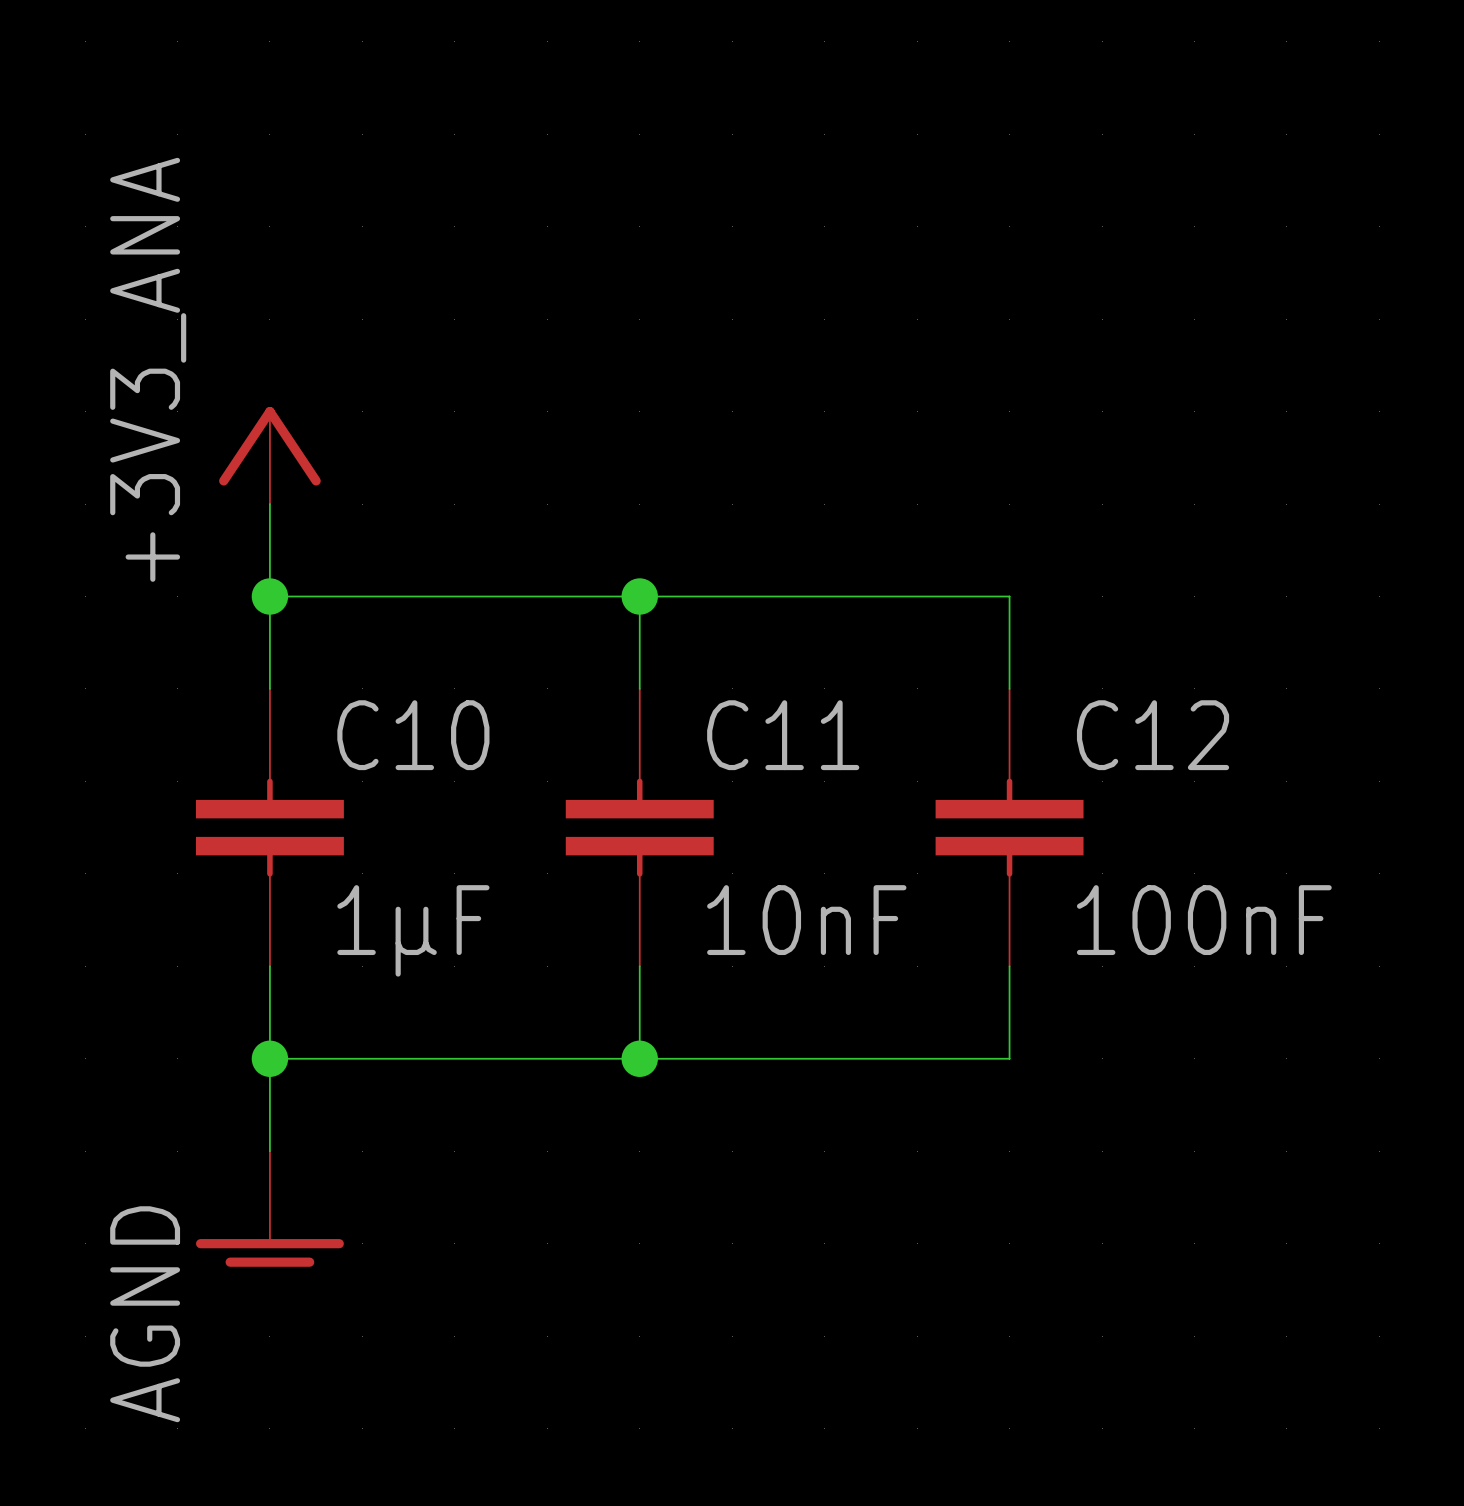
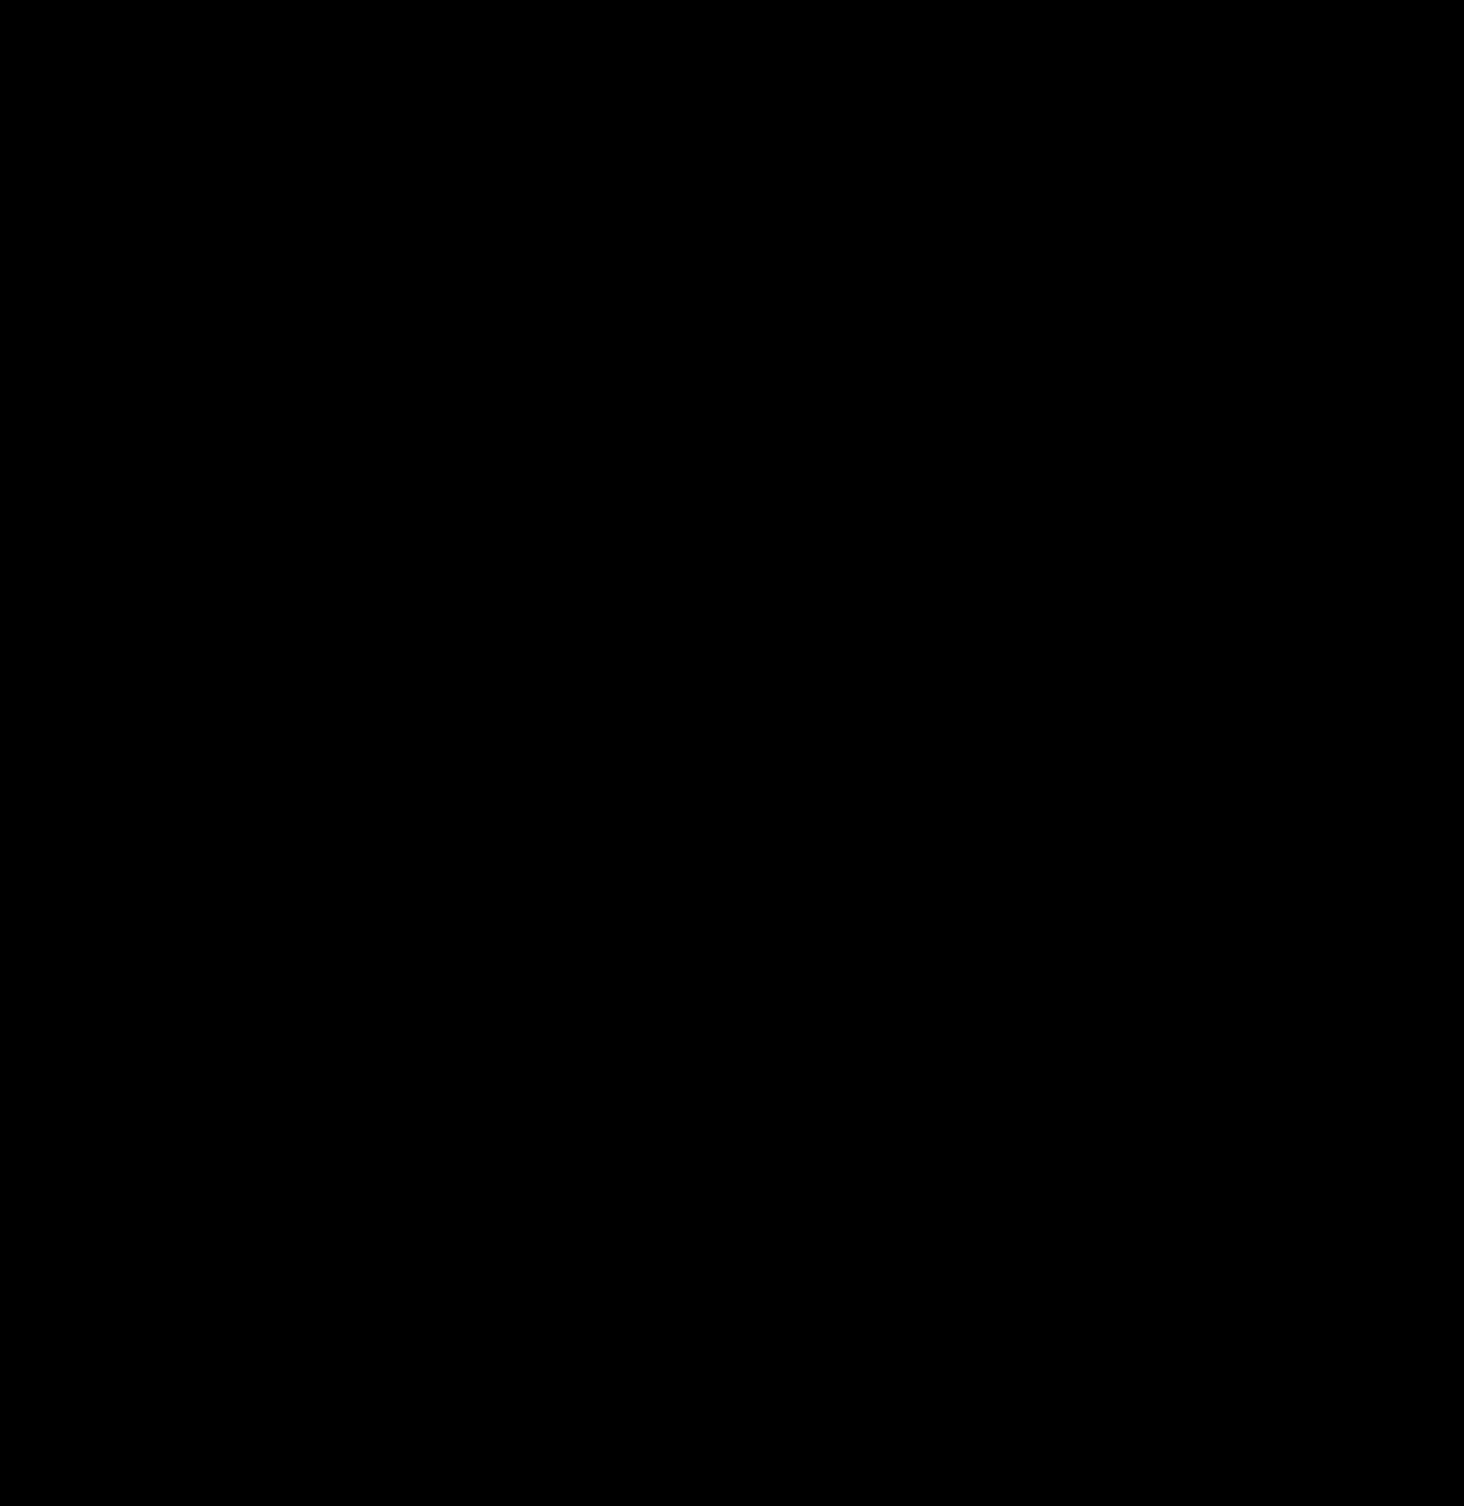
power symbol: +3V3_ANA (269, 455) -> none
wire: (269, 504) (269, 688) -> none
wire: (269, 596) (1009, 596) (1009, 688) -> none
junction: (269, 596) -> none
wire: (639, 596) (639, 688) -> none
junction: (639, 596) -> none
C10: 1µF (269, 827) -> none
C11: 10nF (639, 827) -> none
C12: 100nF (1009, 827) -> none
wire: (269, 966) (269, 1151) -> none
wire: (639, 966) (639, 1058) -> none
wire: (1009, 966) (1009, 1058) (269, 1058) -> none
junction: (269, 1058) -> none
junction: (639, 1058) -> none
power symbol: AGND (269, 1209) -> none

